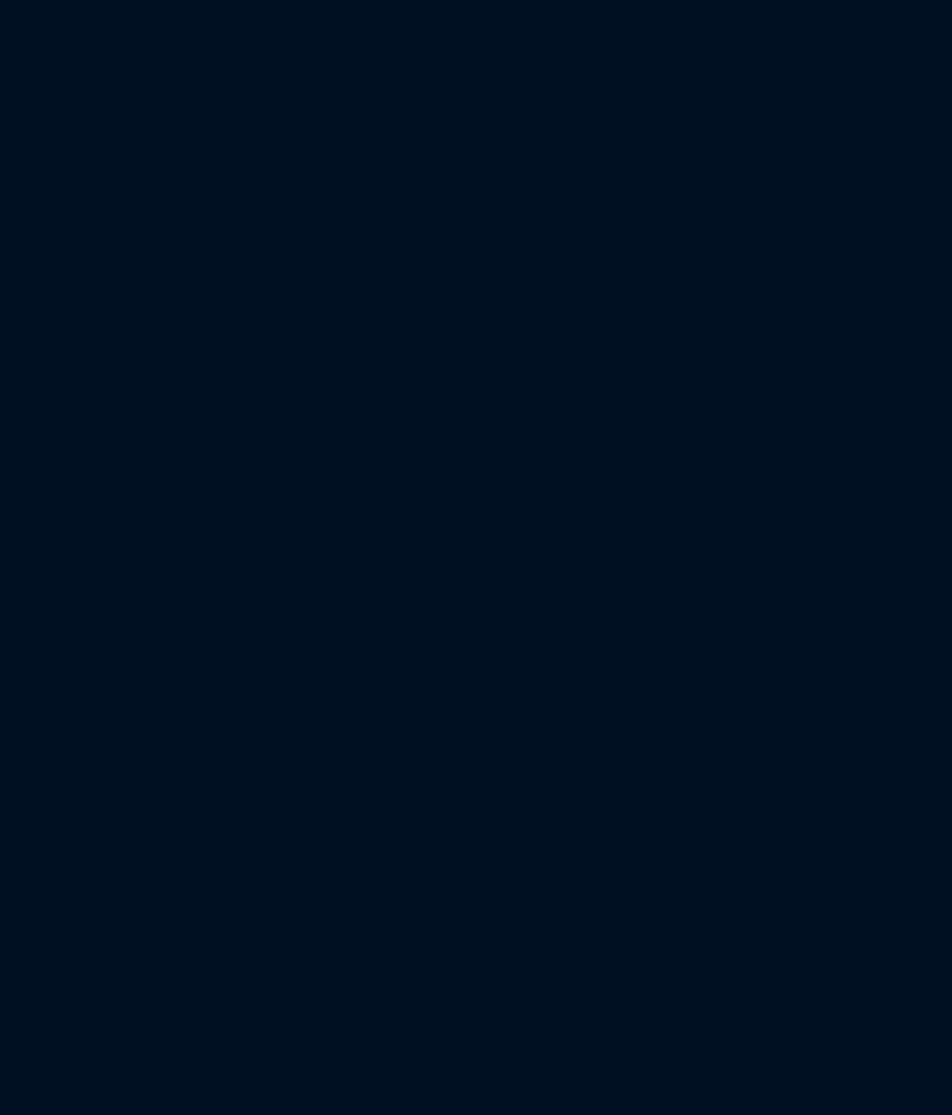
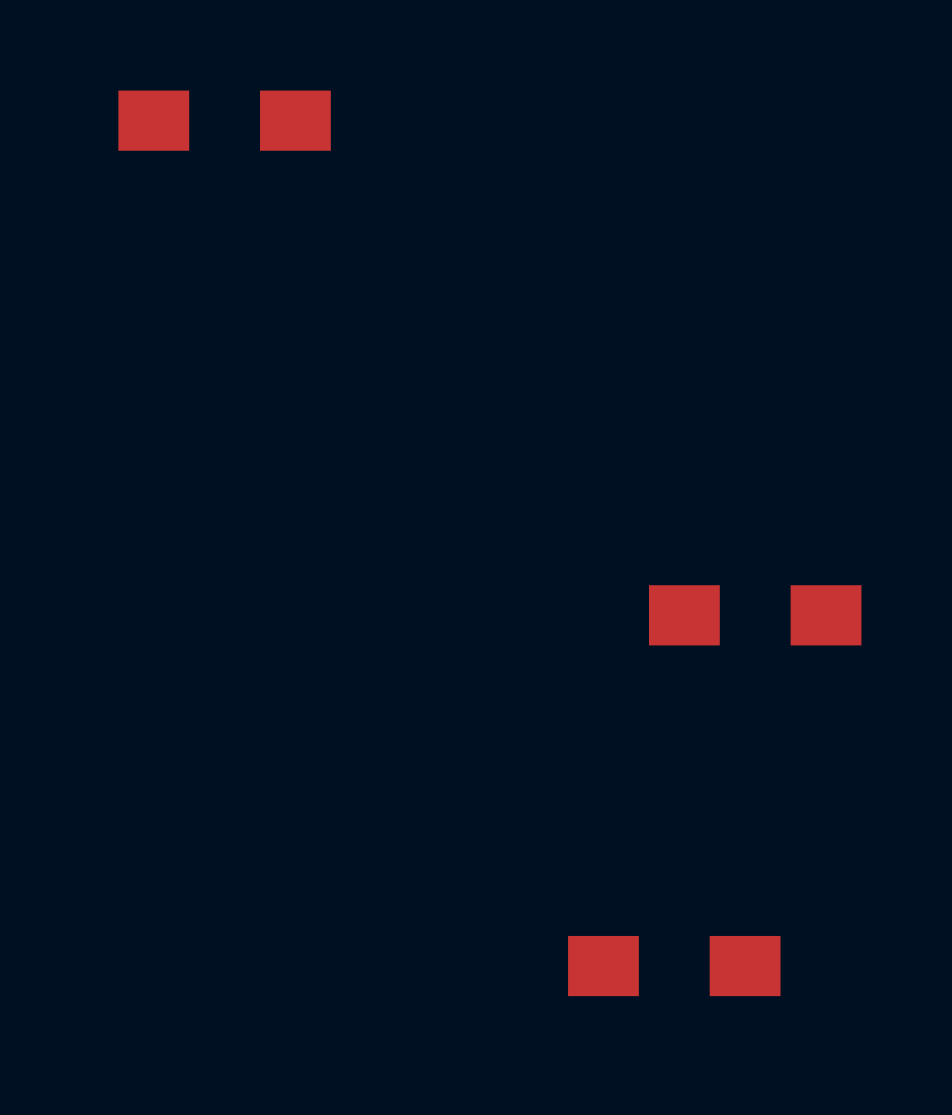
part: none -> (224, 120)
part: none -> (755, 615)
part: none -> (674, 966)

